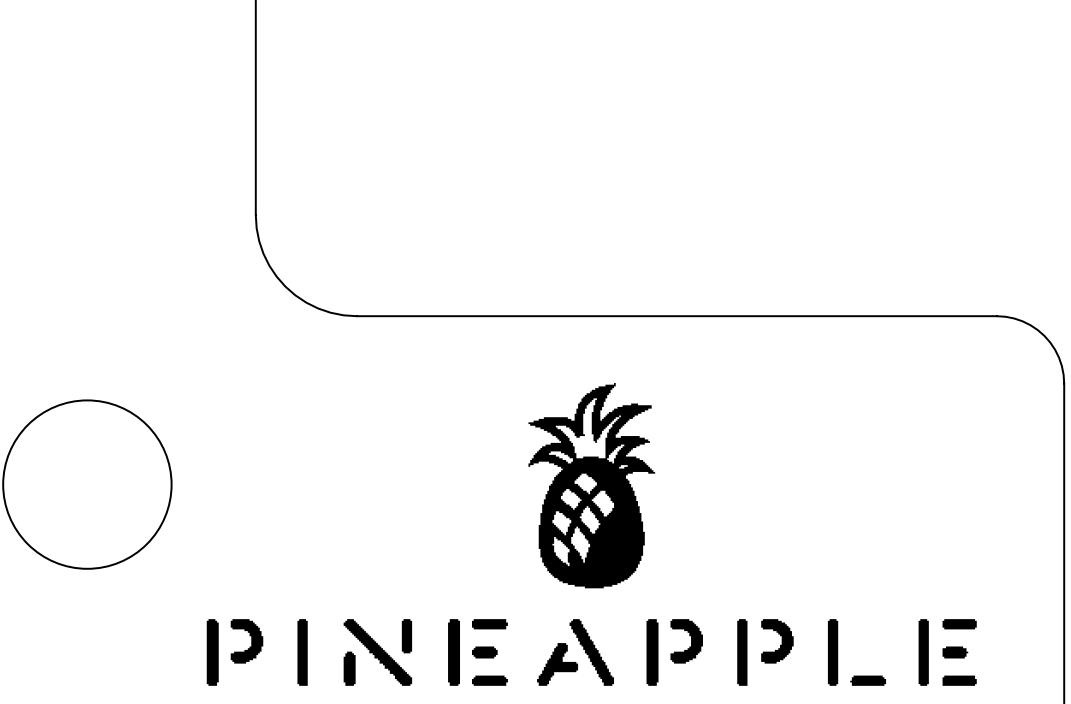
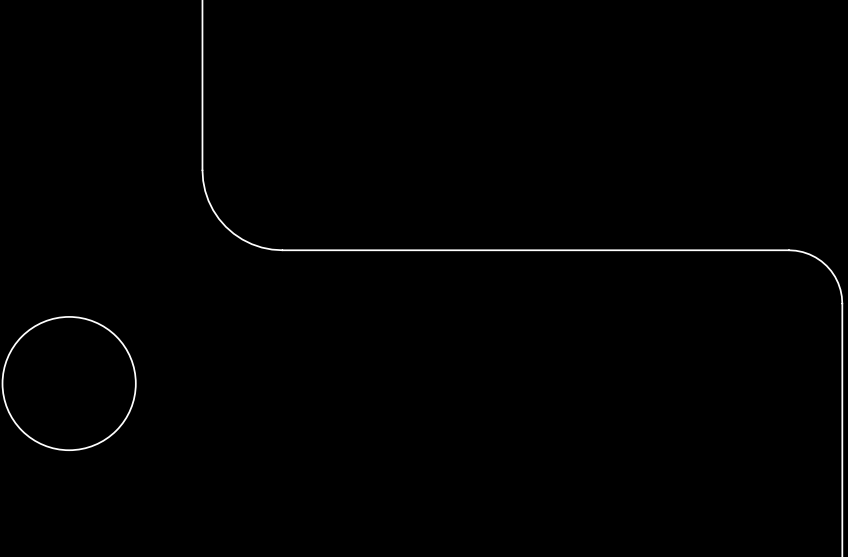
drawing: [206, 382, 977, 686] -> none

